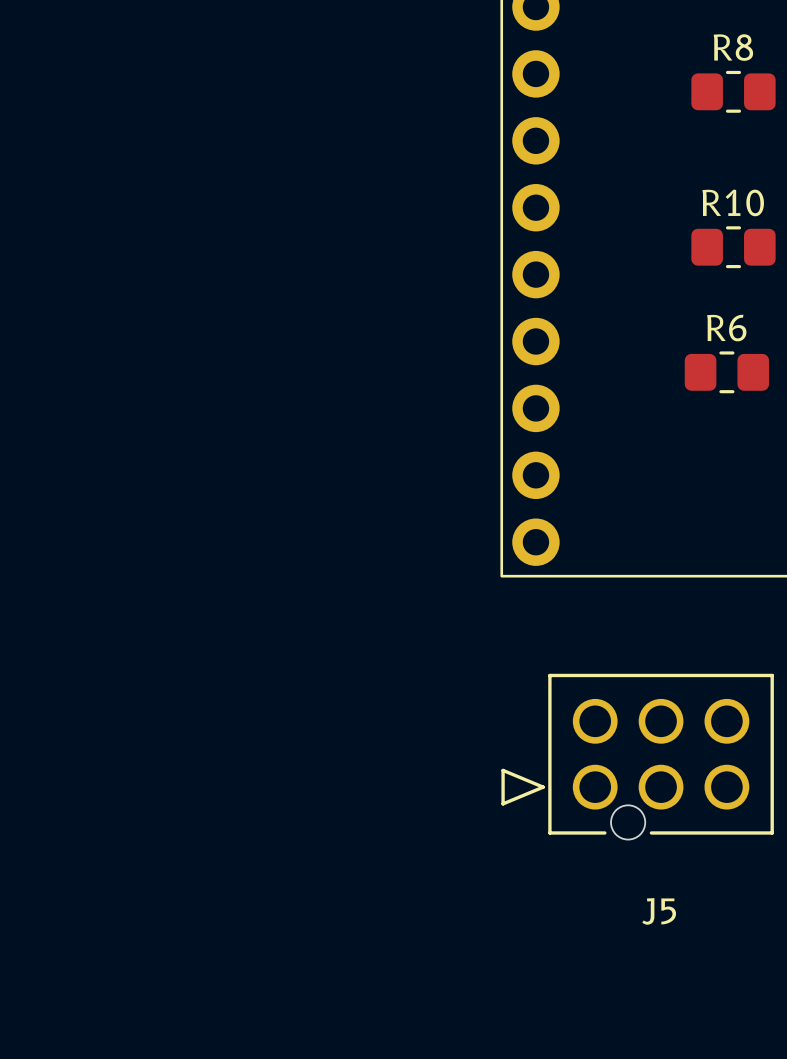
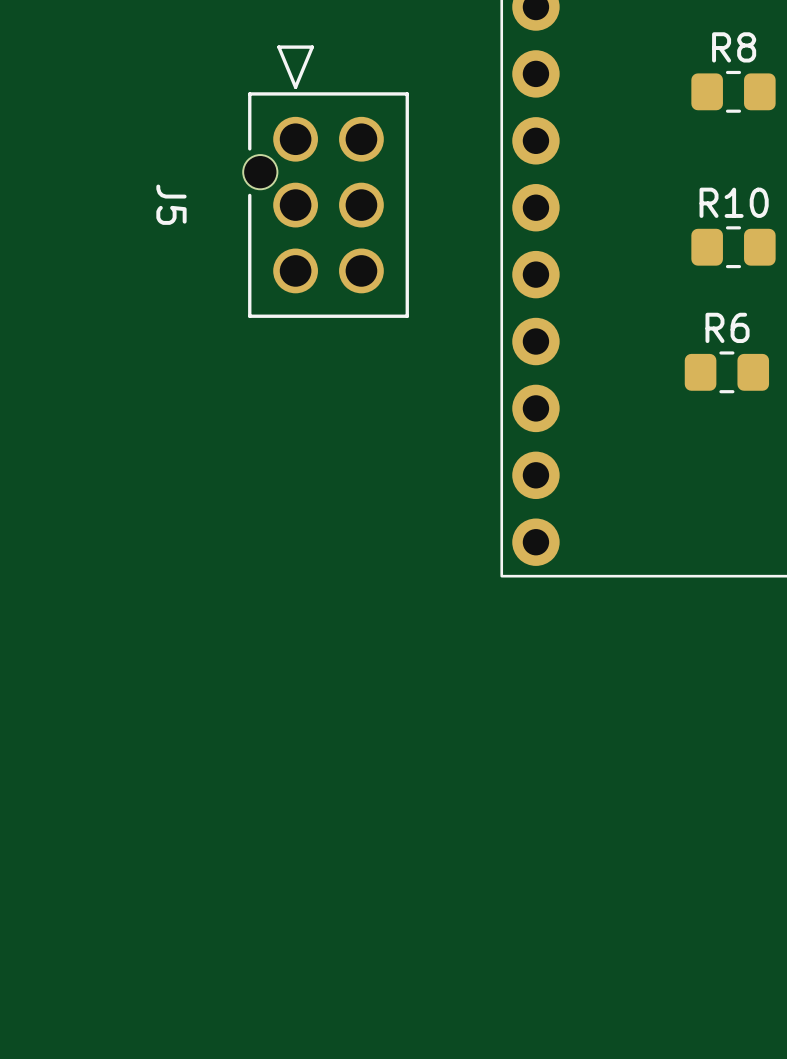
J5 rotation: 0° (637, 756) -> 90° clockwise (326, 181)
J5 position: (637, 756) -> (326, 181)

